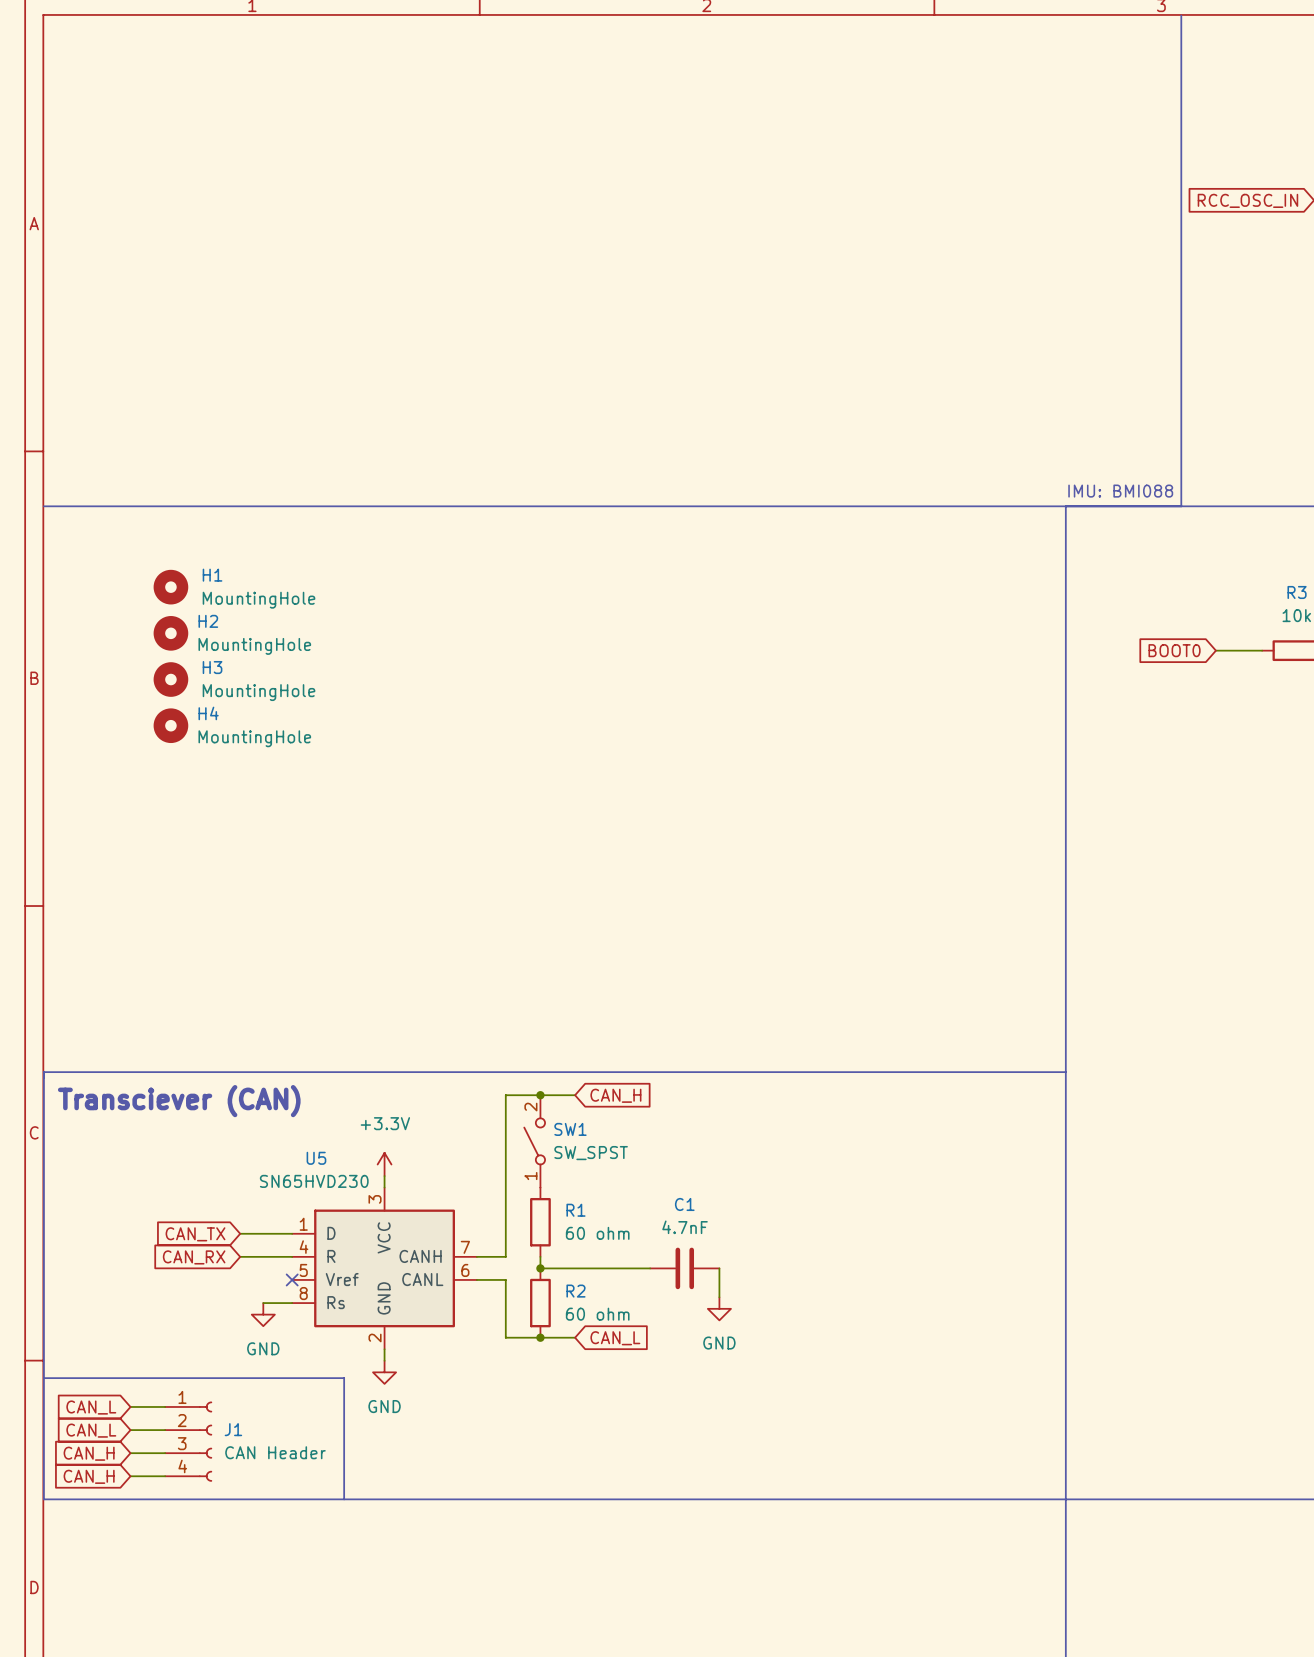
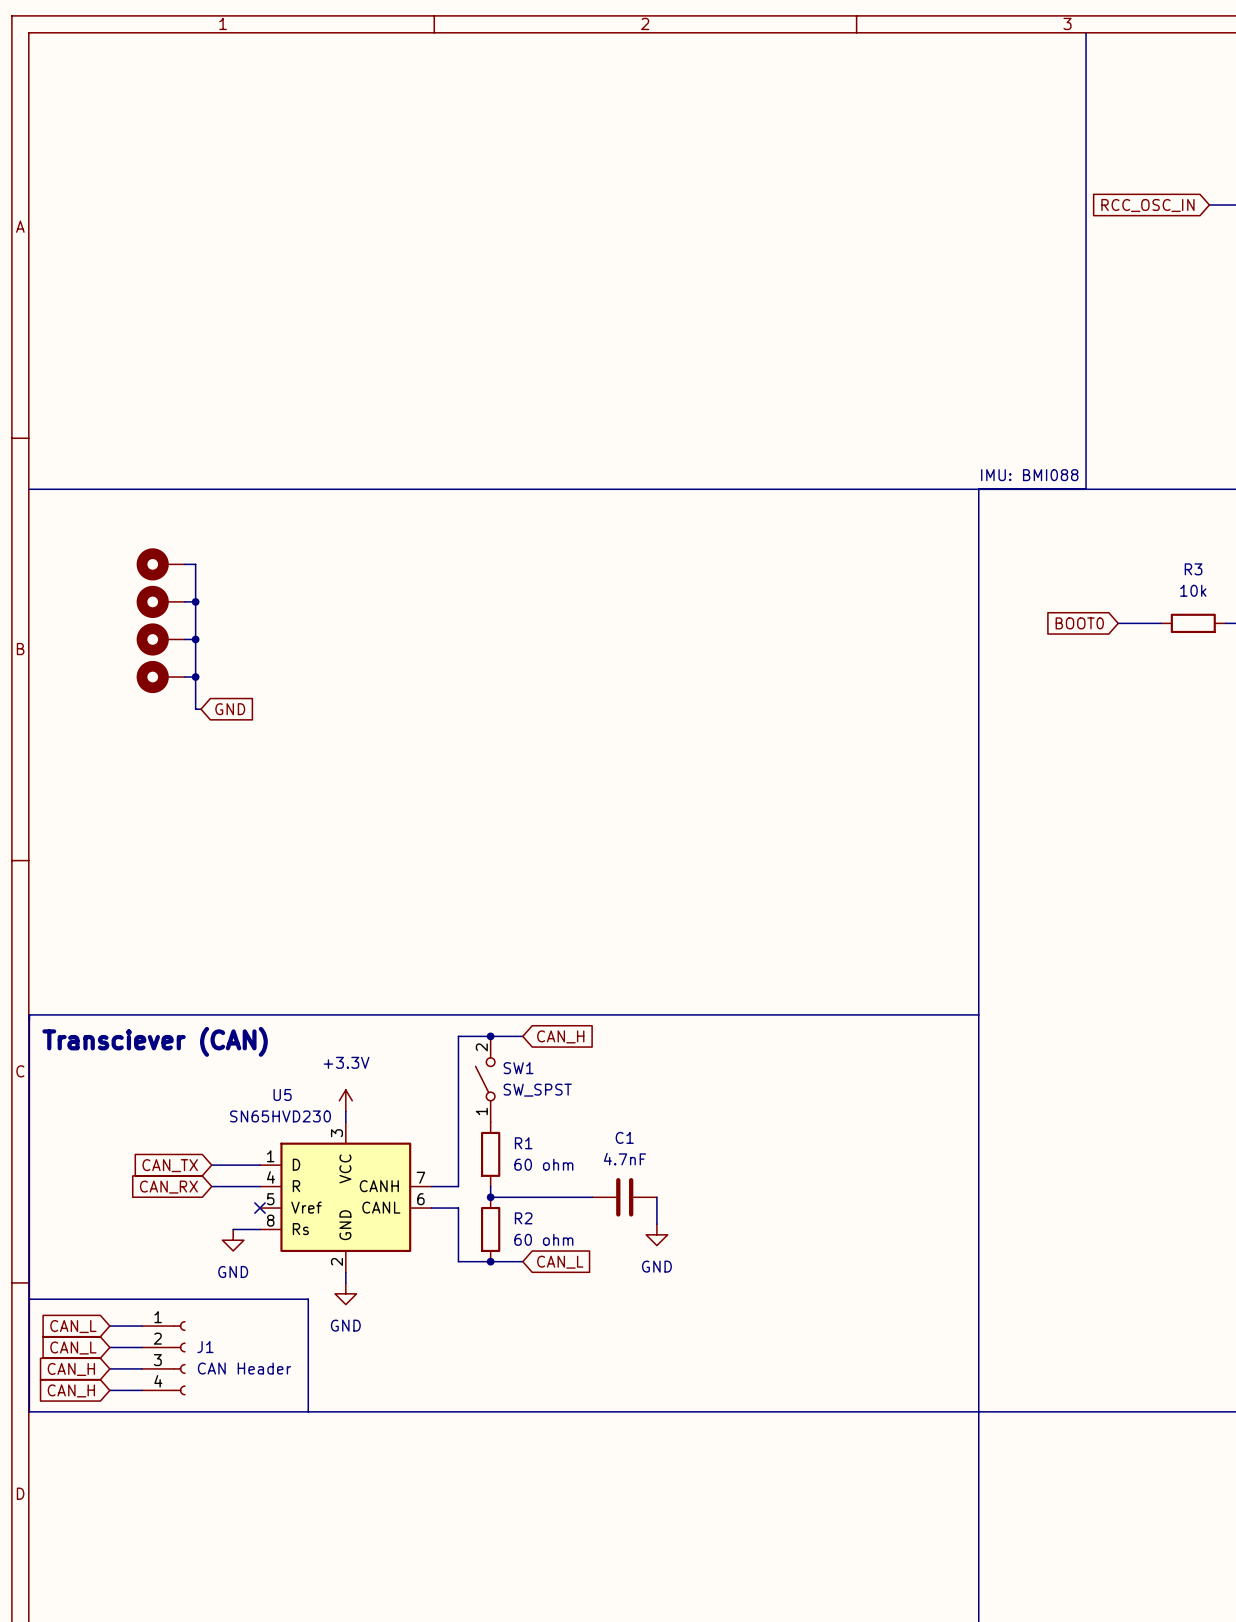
H1: MountingHole (170, 587) -> none
part: none -> (160, 564)
wire: none -> (184, 564) (195, 564) (195, 709) (200, 709)
part: none -> (160, 601)
wire: none -> (184, 601) (195, 601)
junction: none -> (195, 601)
H2: MountingHole (170, 633) -> none
part: none -> (160, 639)
wire: none -> (184, 639) (195, 639)
junction: none -> (195, 639)
H3: MountingHole (170, 679) -> none
part: none -> (160, 677)
wire: none -> (184, 677) (195, 677)
junction: none -> (195, 677)
H4: MountingHole (170, 725) -> none
global label: none -> GND (230, 709)

